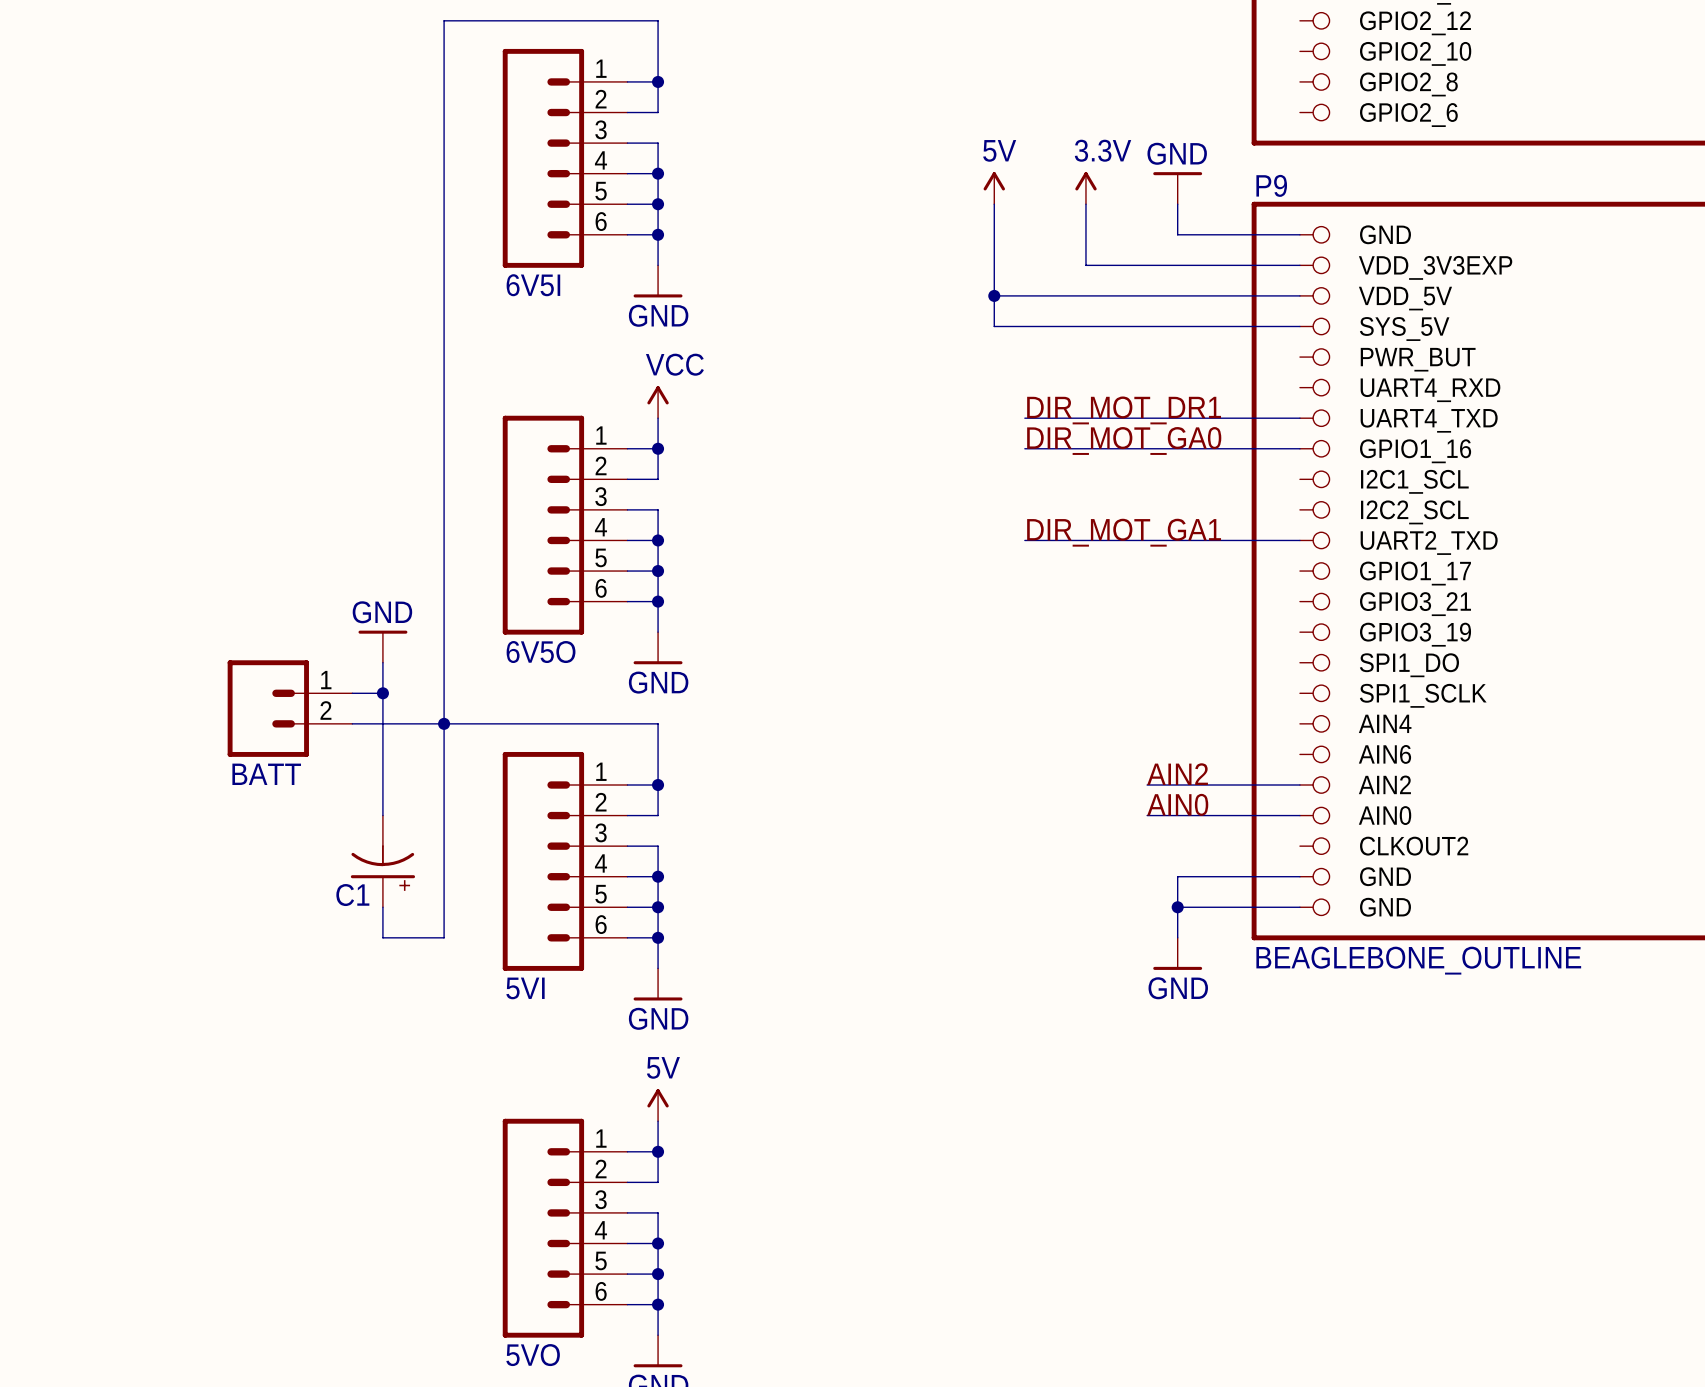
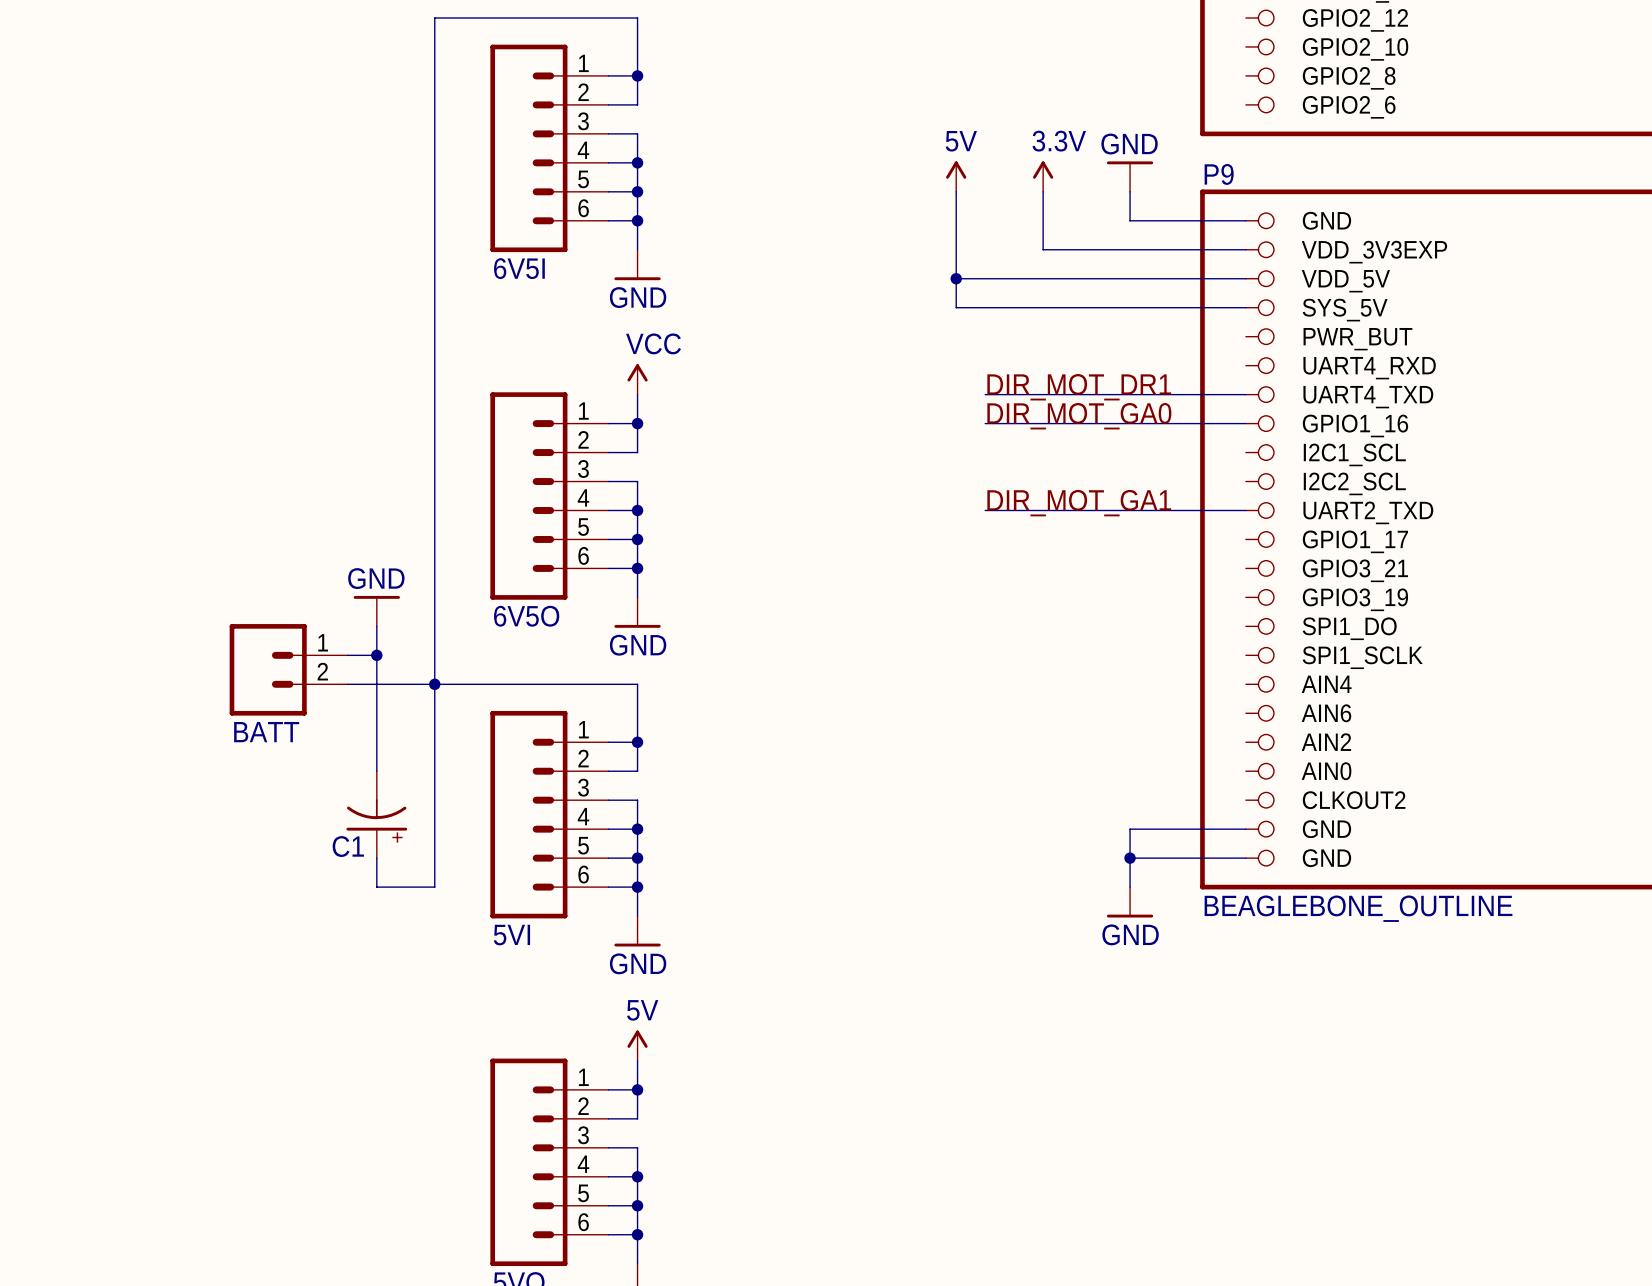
label: AIN2 (1177, 774) -> none
wire: (1147, 785) (1299, 785) -> none
label: AIN0 (1177, 804) -> none
wire: (1147, 815) (1299, 815) -> none

